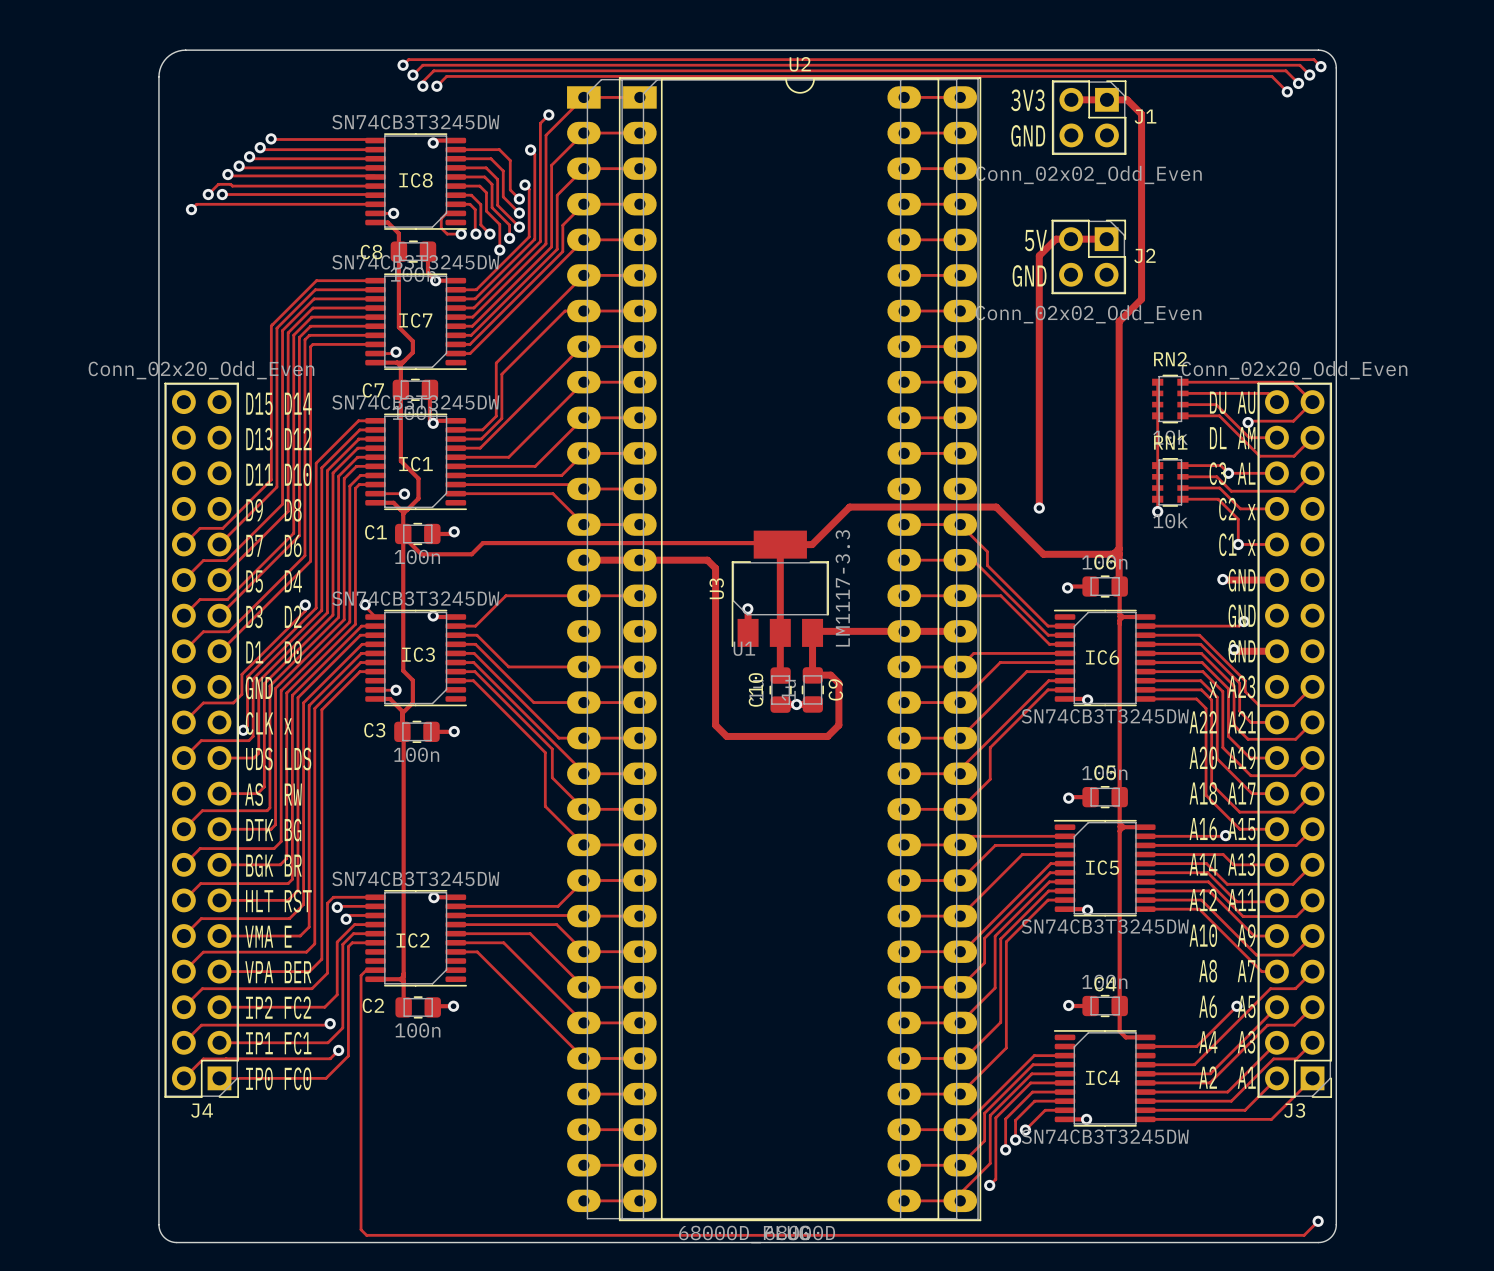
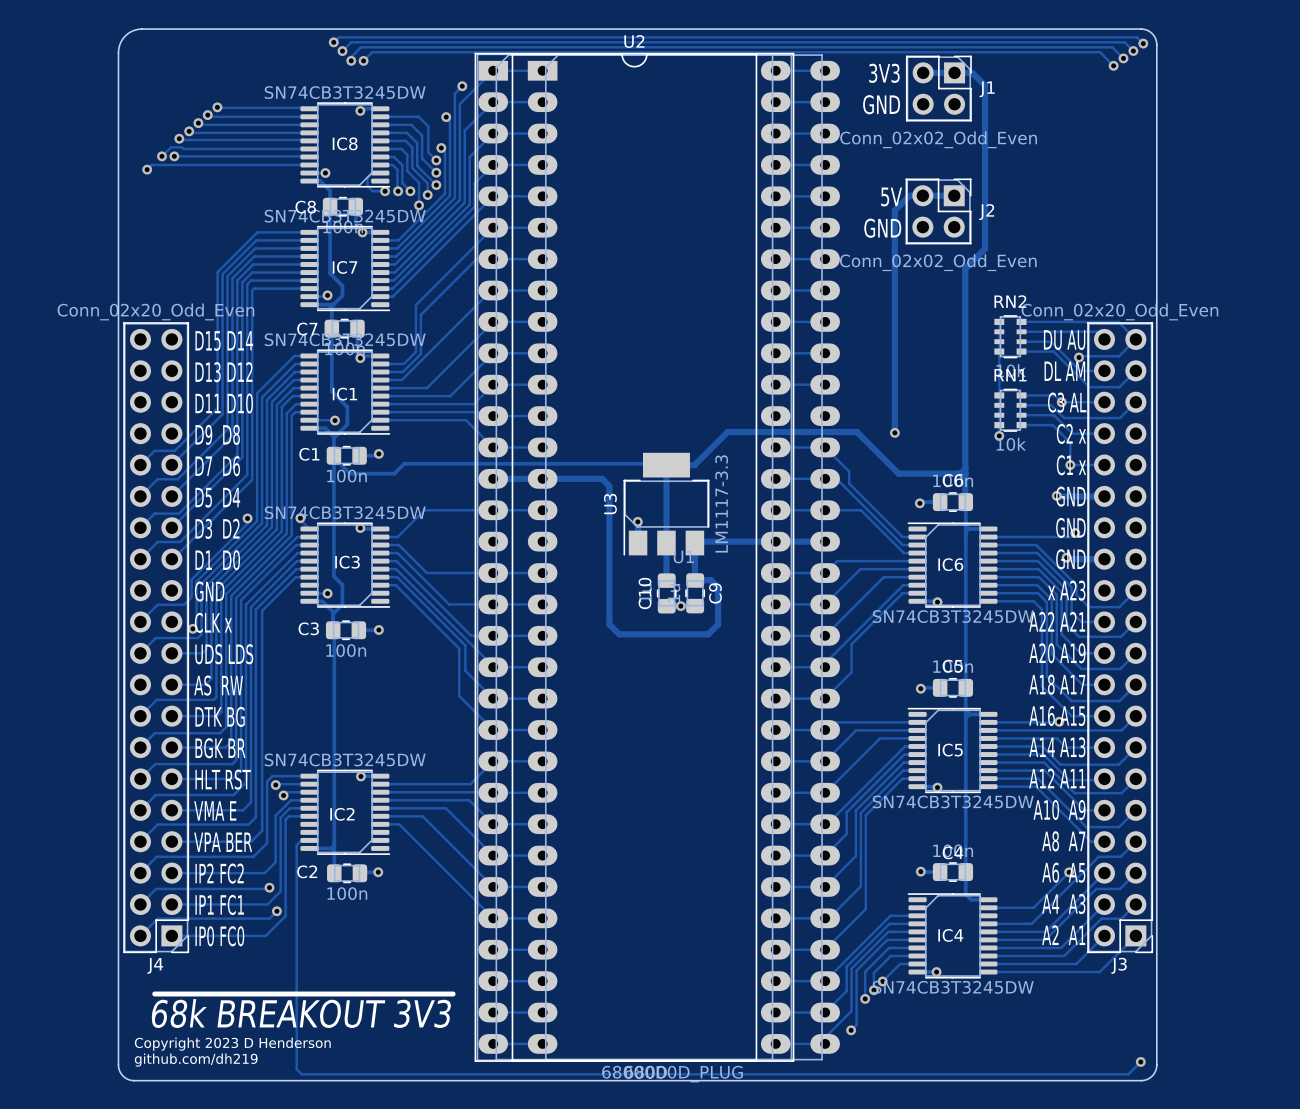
U1 position: (744, 649) -> (683, 557)
U2 position: (800, 649) -> (634, 557)
text: none -> ~{68k BREAKOUT 3V3} (302, 1010)
text: none -> Copyright 2023 D Henderson (232, 1044)
text: none -> github.com/dh219 (196, 1060)

